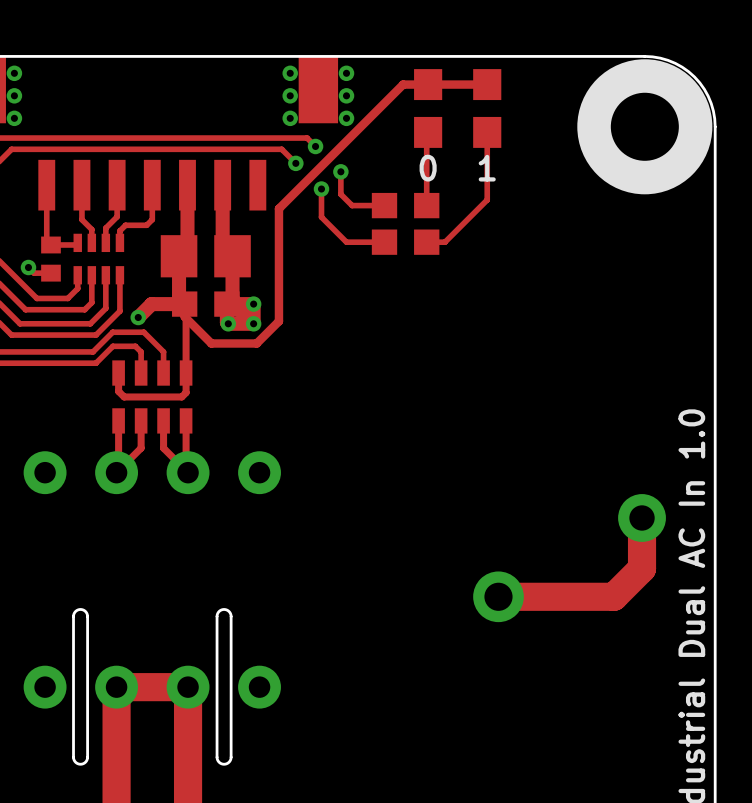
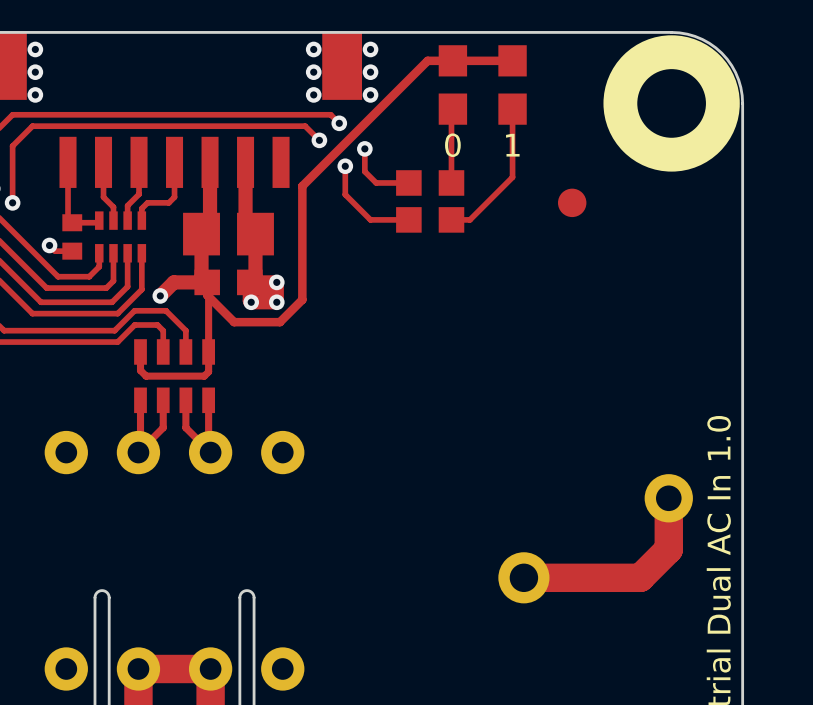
part: none -> (572, 202)

